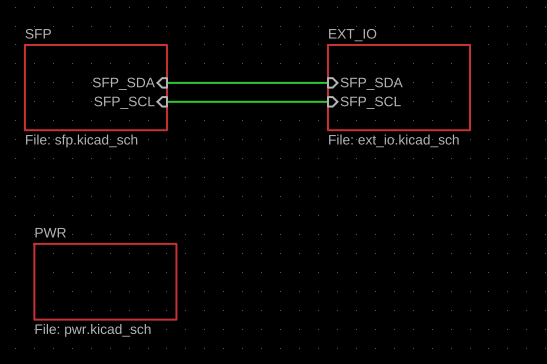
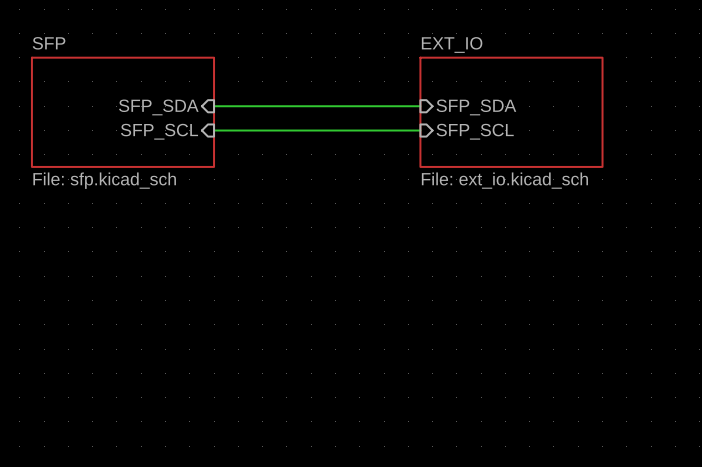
sheet PWR: File: pwr.kicad_sch (105, 281) -> none

